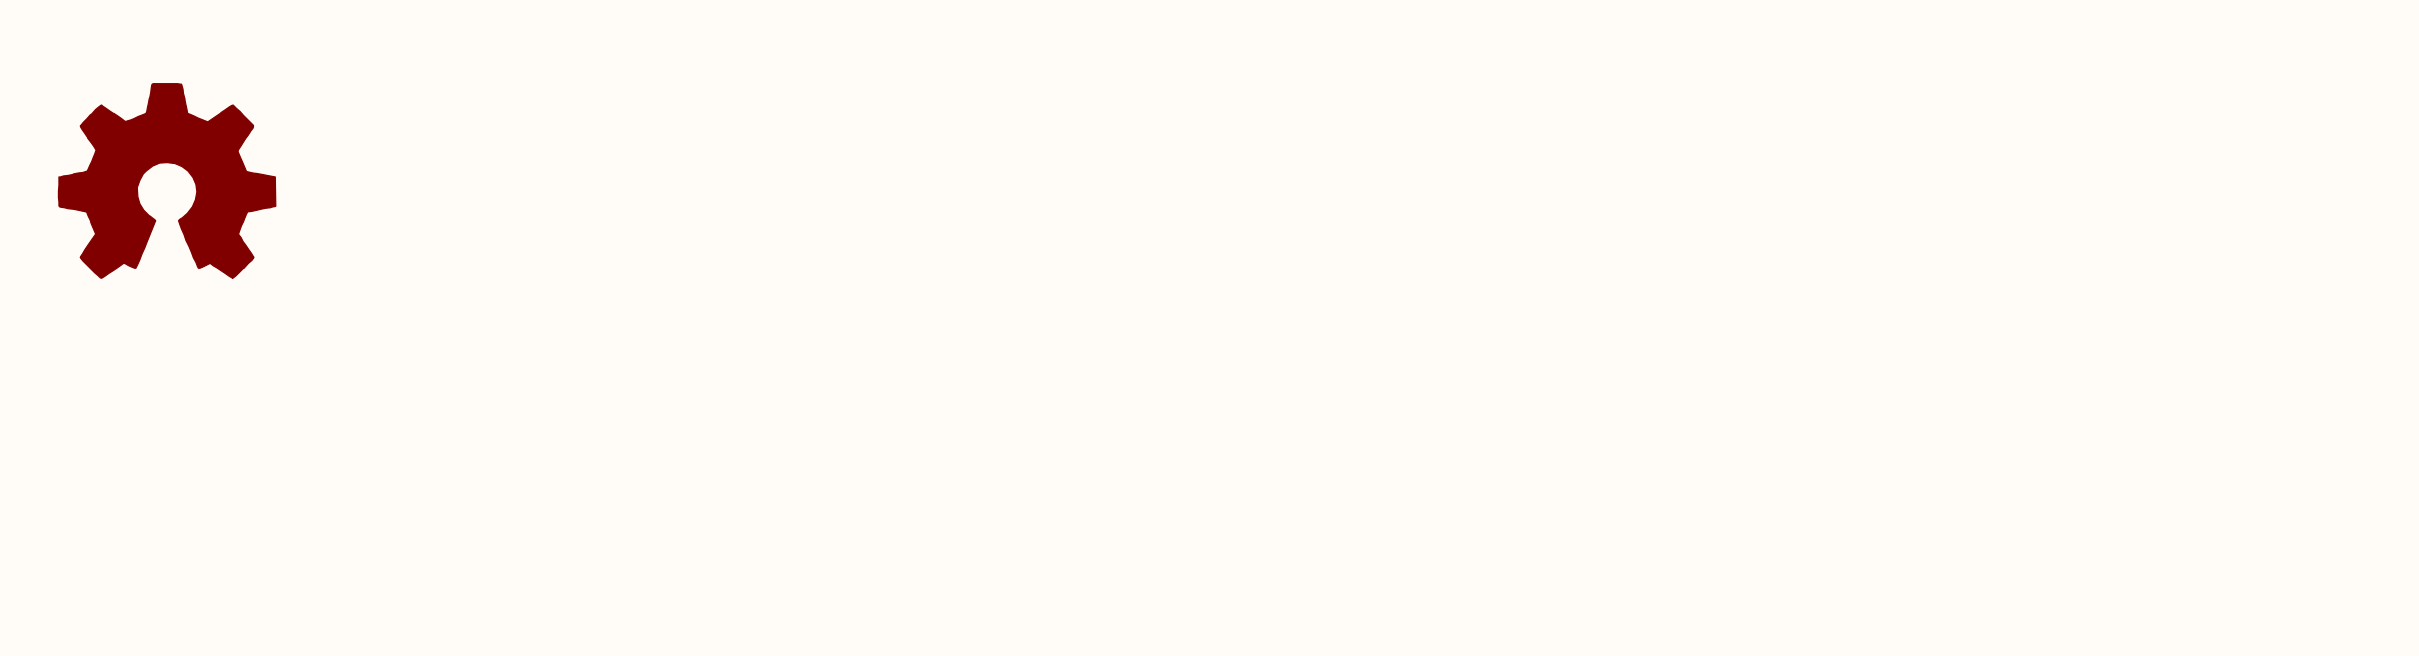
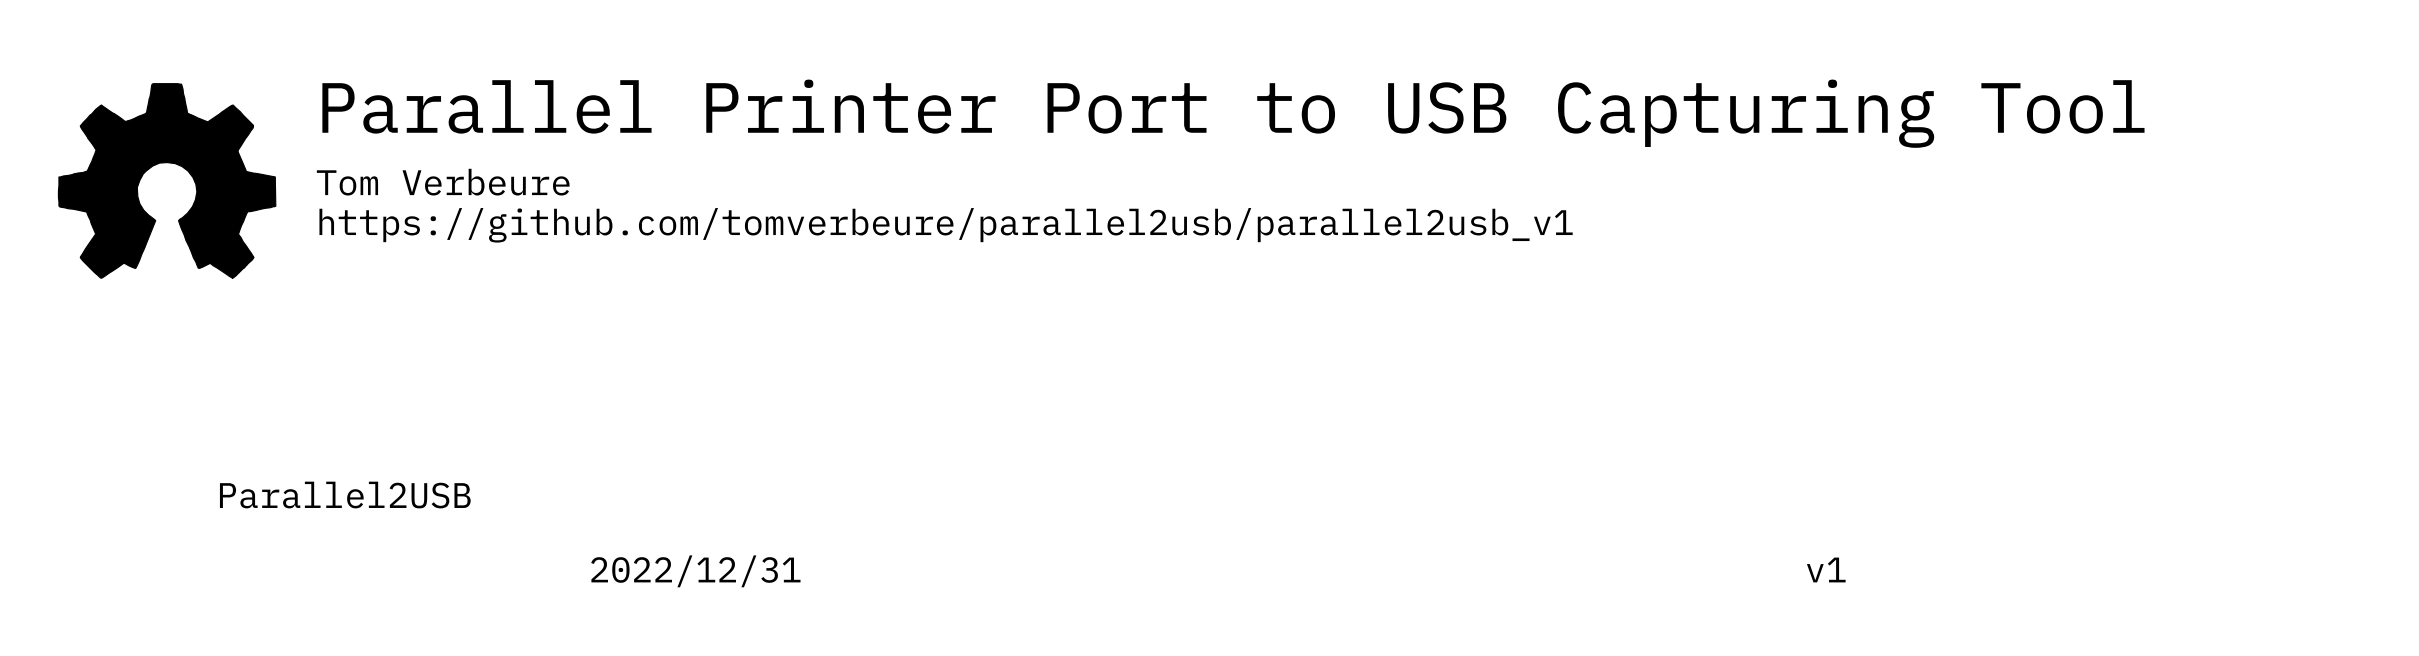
text: none -> Parallel Printer Port to USB Capturing Tool (1233, 113)
text: none -> Tom Verbeure (443, 182)
text: none -> https://github.com/tomverbeure/parallel2usb/parallel2usb_v1 (946, 225)
text: none -> Parallel2USB (345, 495)
text: none -> v1 (1826, 569)
text: none -> 2022/12/31 (695, 571)

